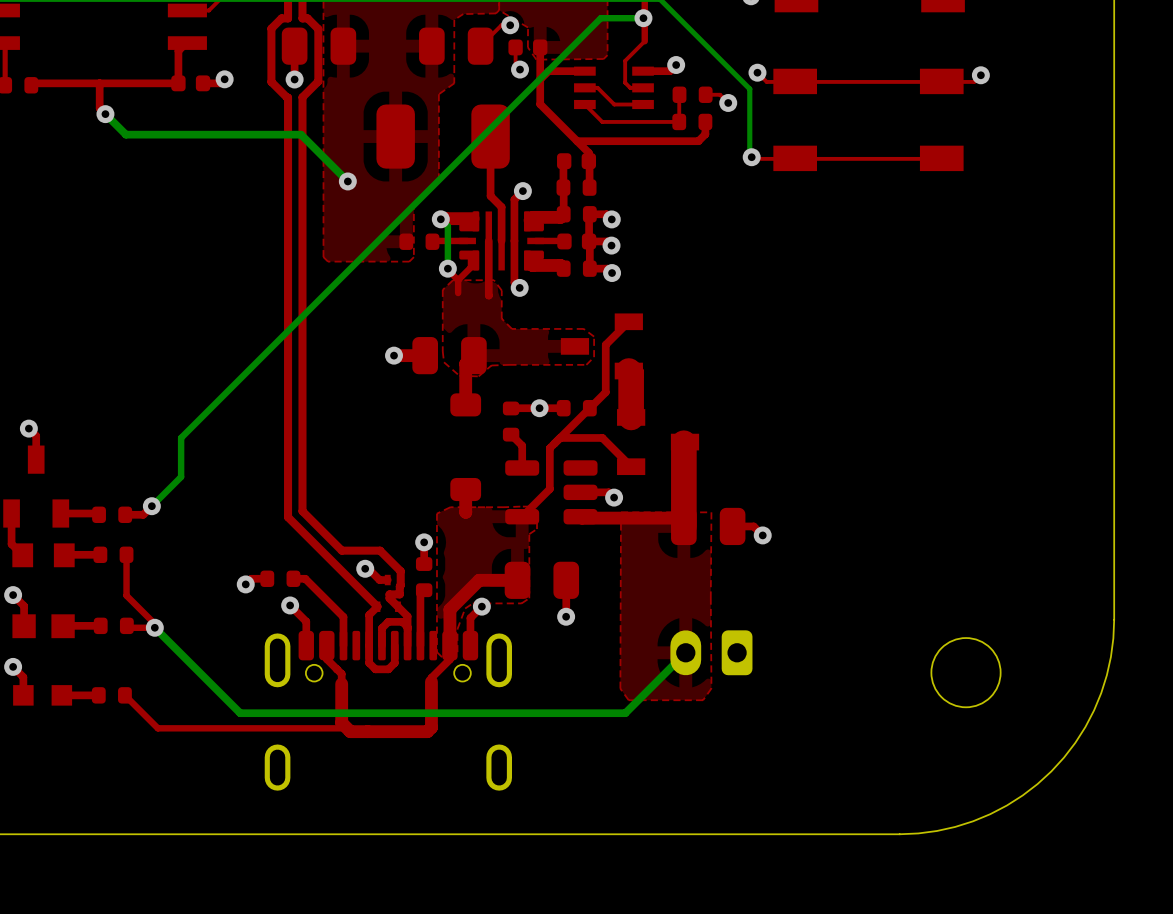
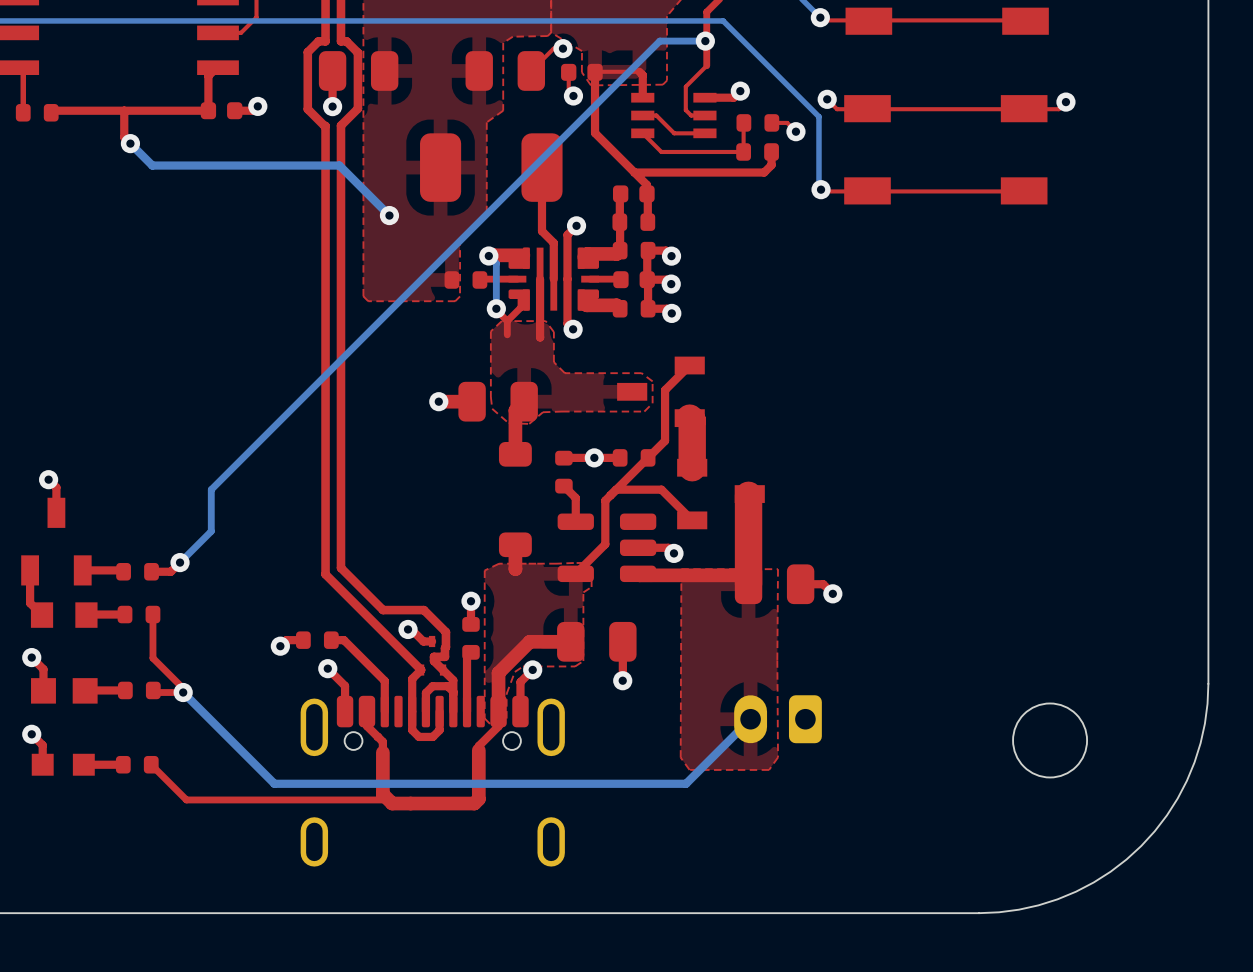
top track: (584, 71) (548, 71) (540, 79) -> (642, 97) (642, 75) (639, 71) (595, 71)

